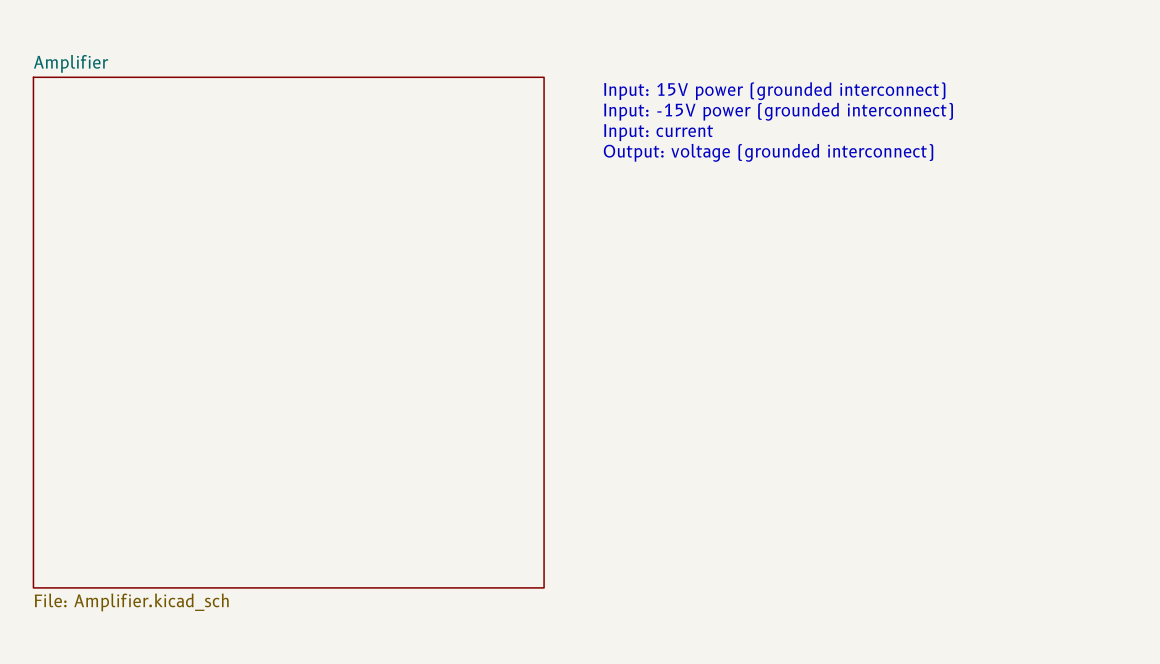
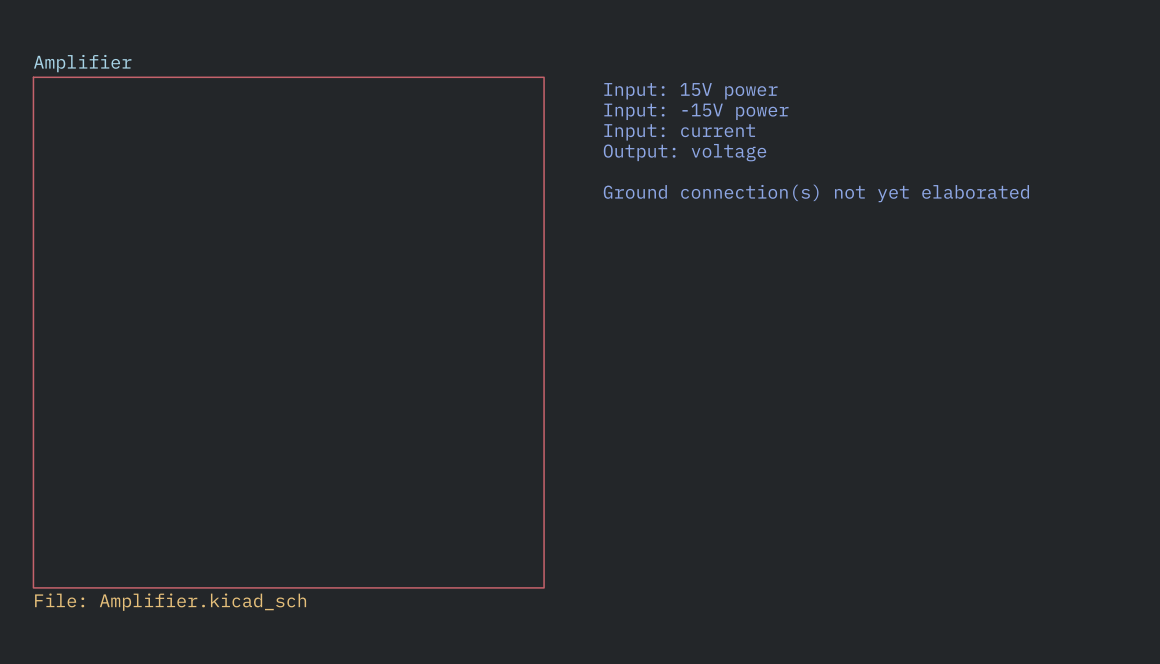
text: Input: 15V power (grounded interconnect) (774, 91) -> Input: 15V power (690, 91)
text: Input: -15V power (grounded interconnect) (778, 111) -> Input: -15V power (696, 111)
text: Output: voltage (grounded interconnect) (768, 152) -> Output: voltage (684, 152)
text: none -> Ground connection(s) not yet elaborated (816, 193)

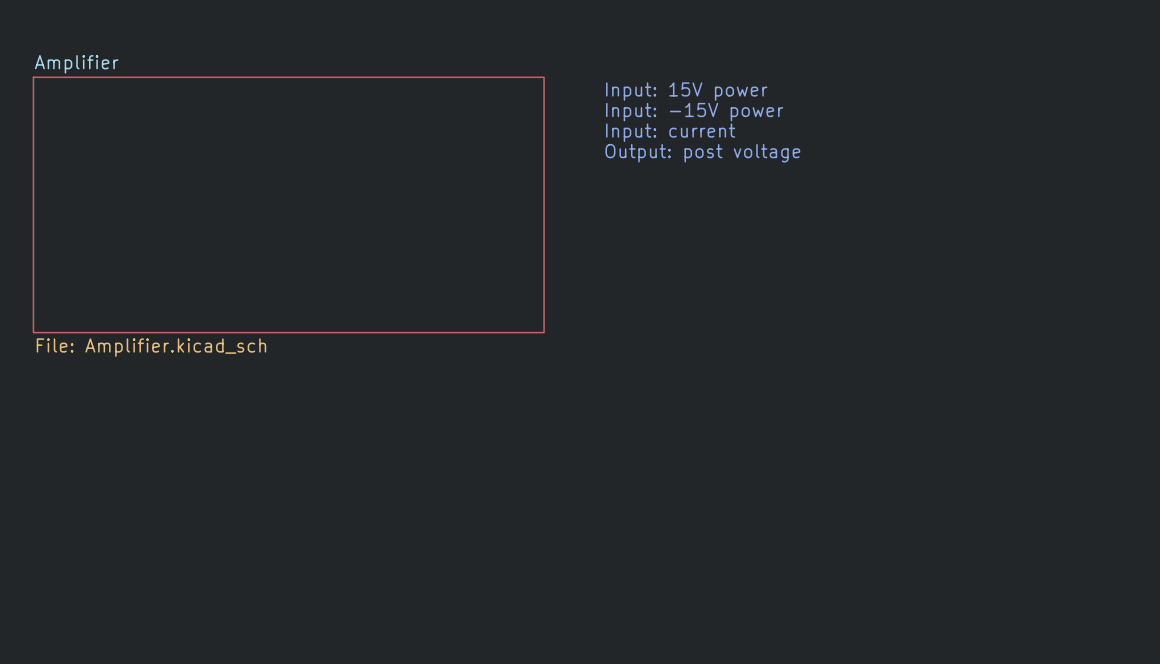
text: Output: voltage (684, 152) -> Output: post voltage (702, 153)
text: Ground connection(s) not yet elaborated (816, 193) -> none
sheet Amplifier: none -> File: Amplifier.kicad_sch (288, 204)
sheet Amplifier: File: Amplifier.kicad_sch (288, 332) -> none

